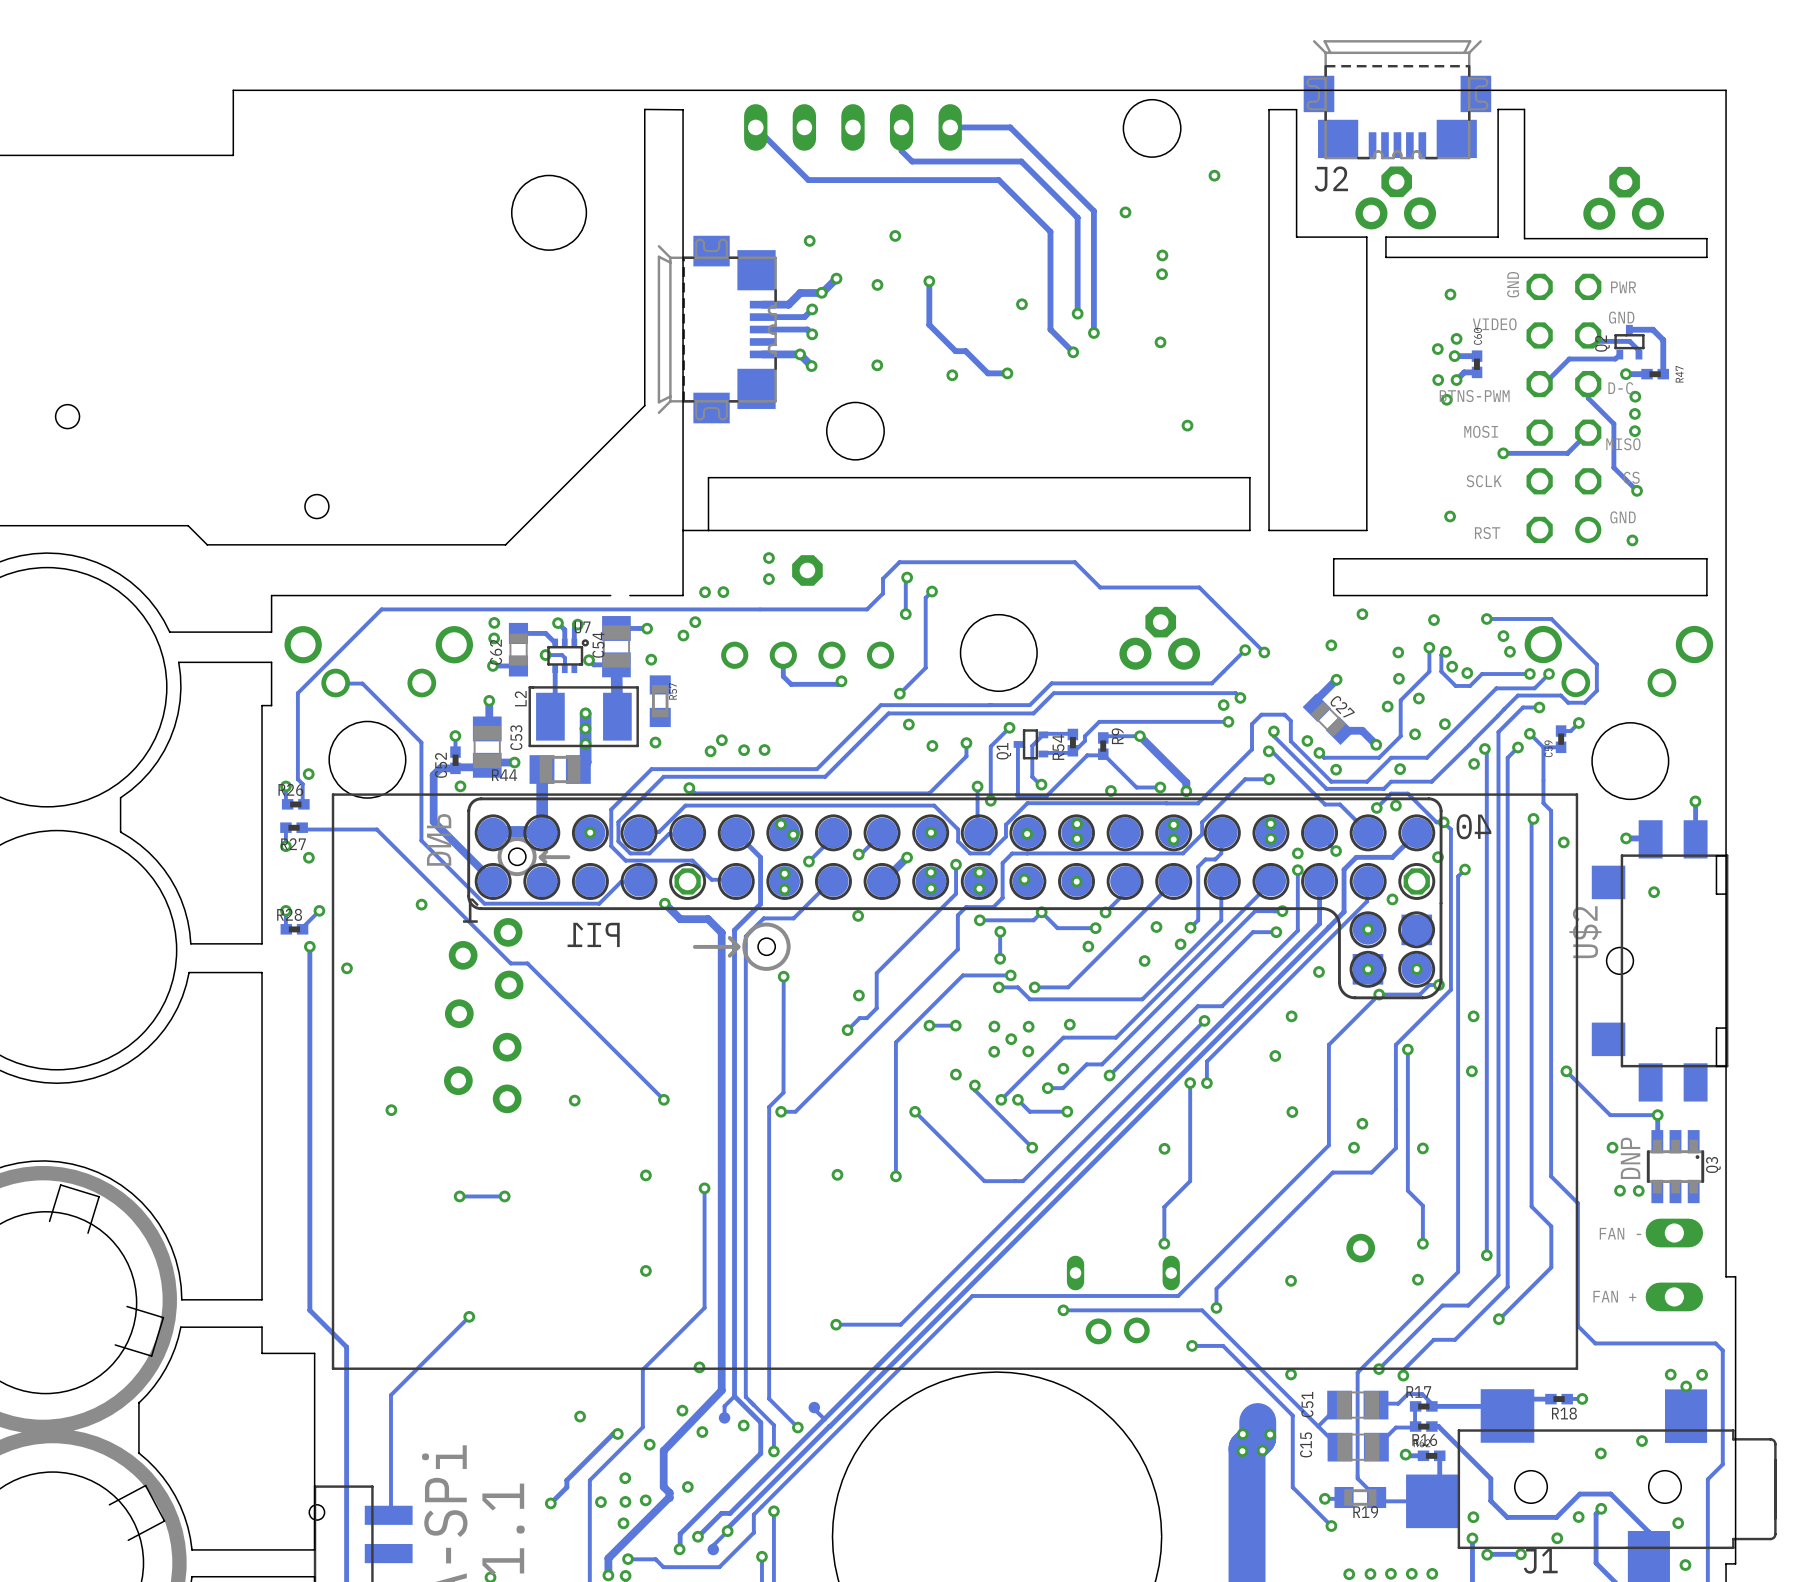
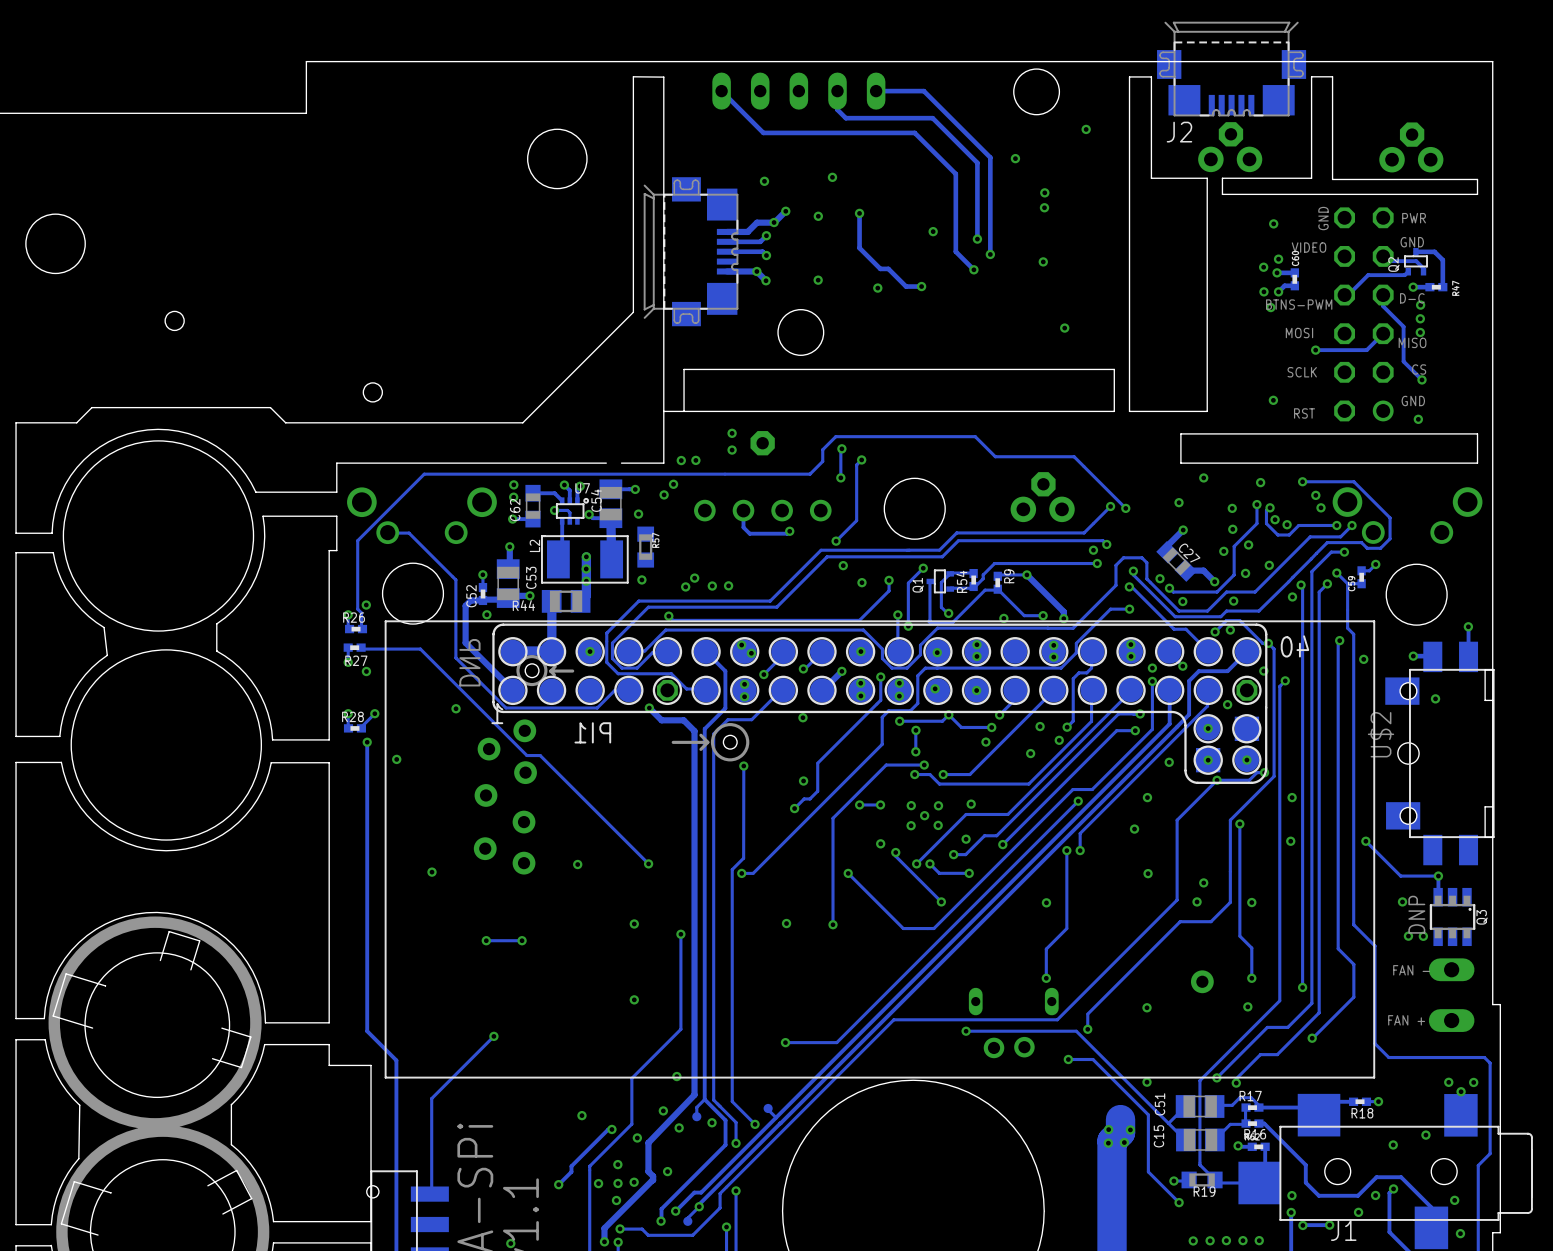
U$2 footprint: [1591, 820, 1729, 1102] -> [1385, 641, 1495, 866]

